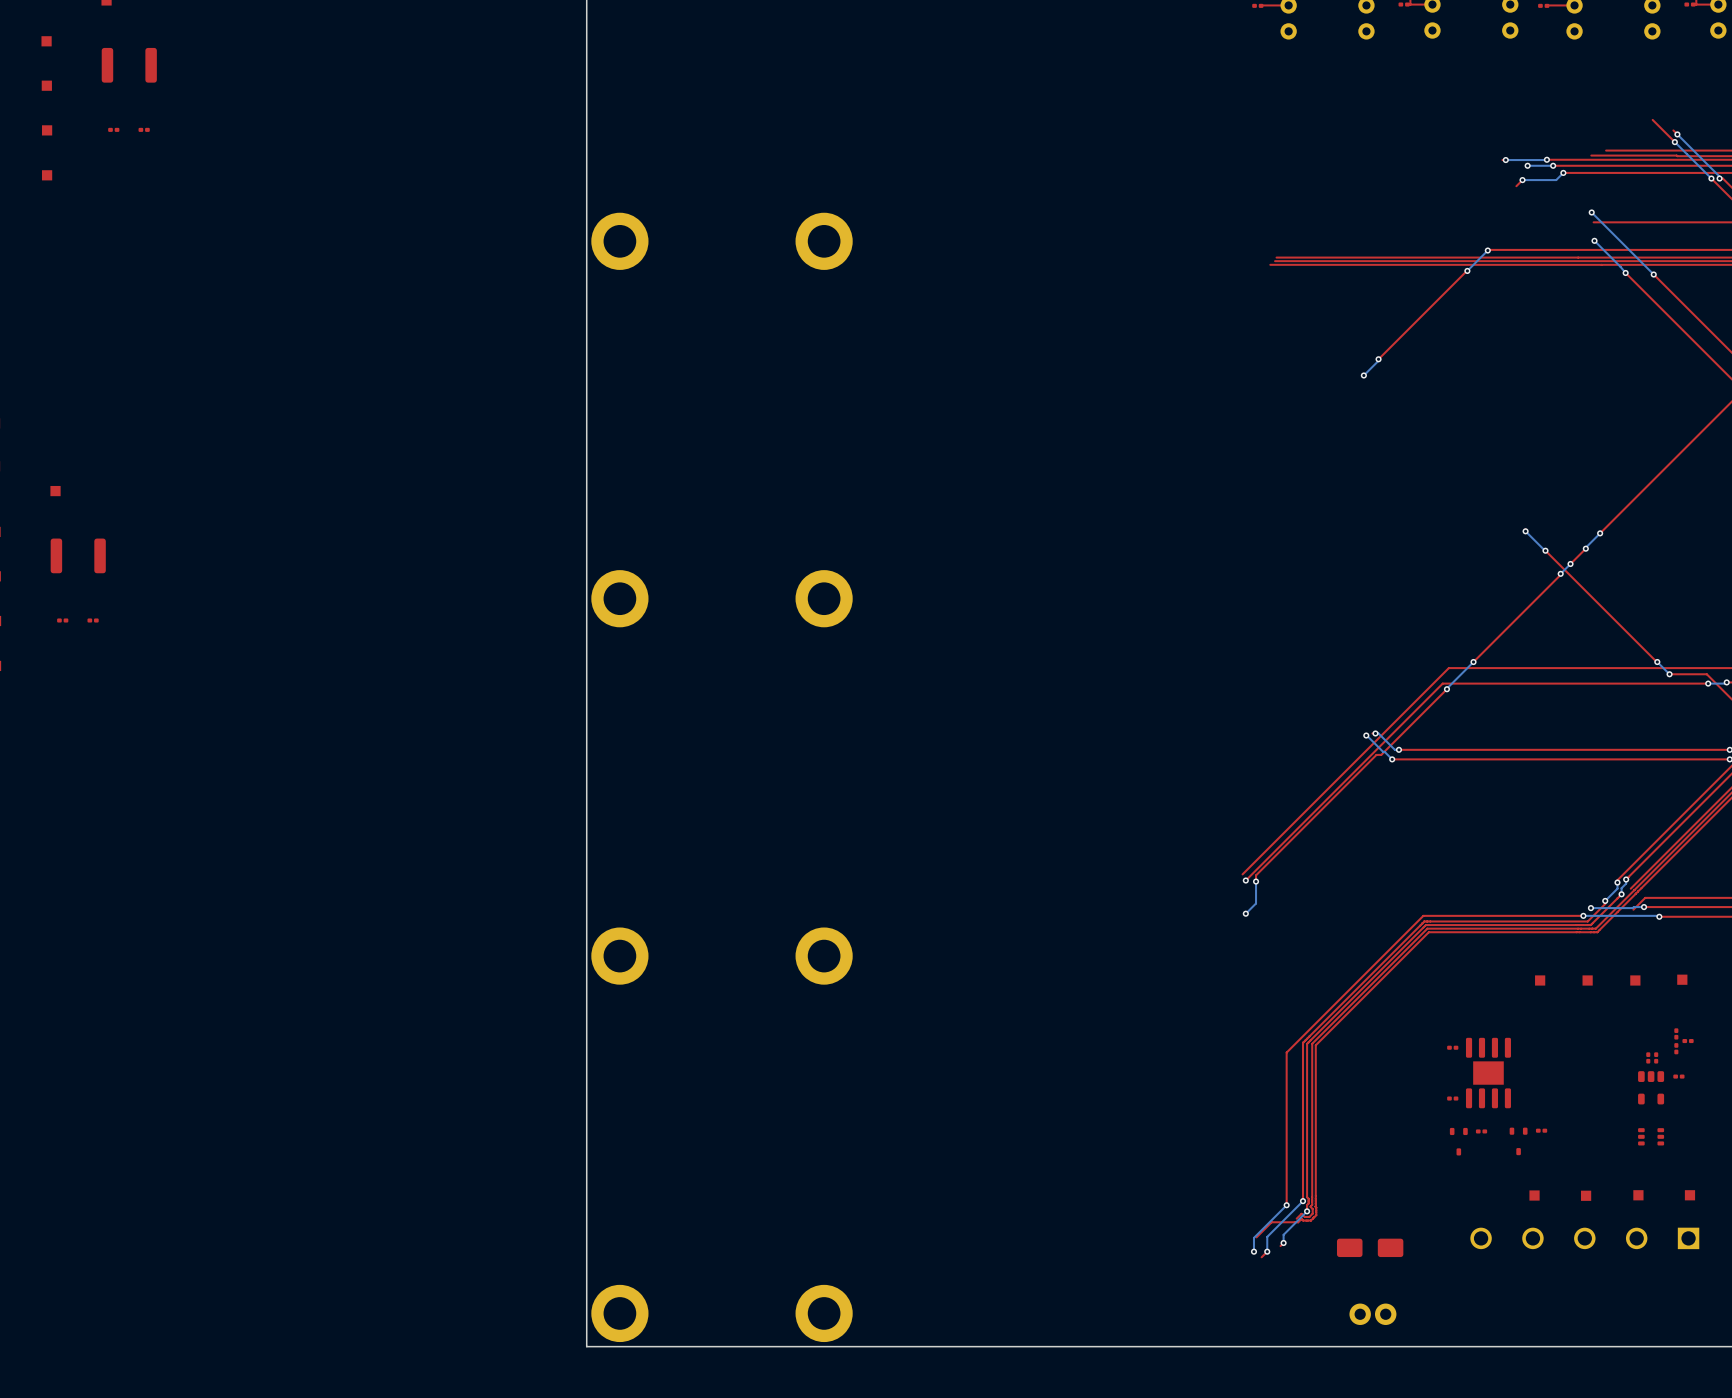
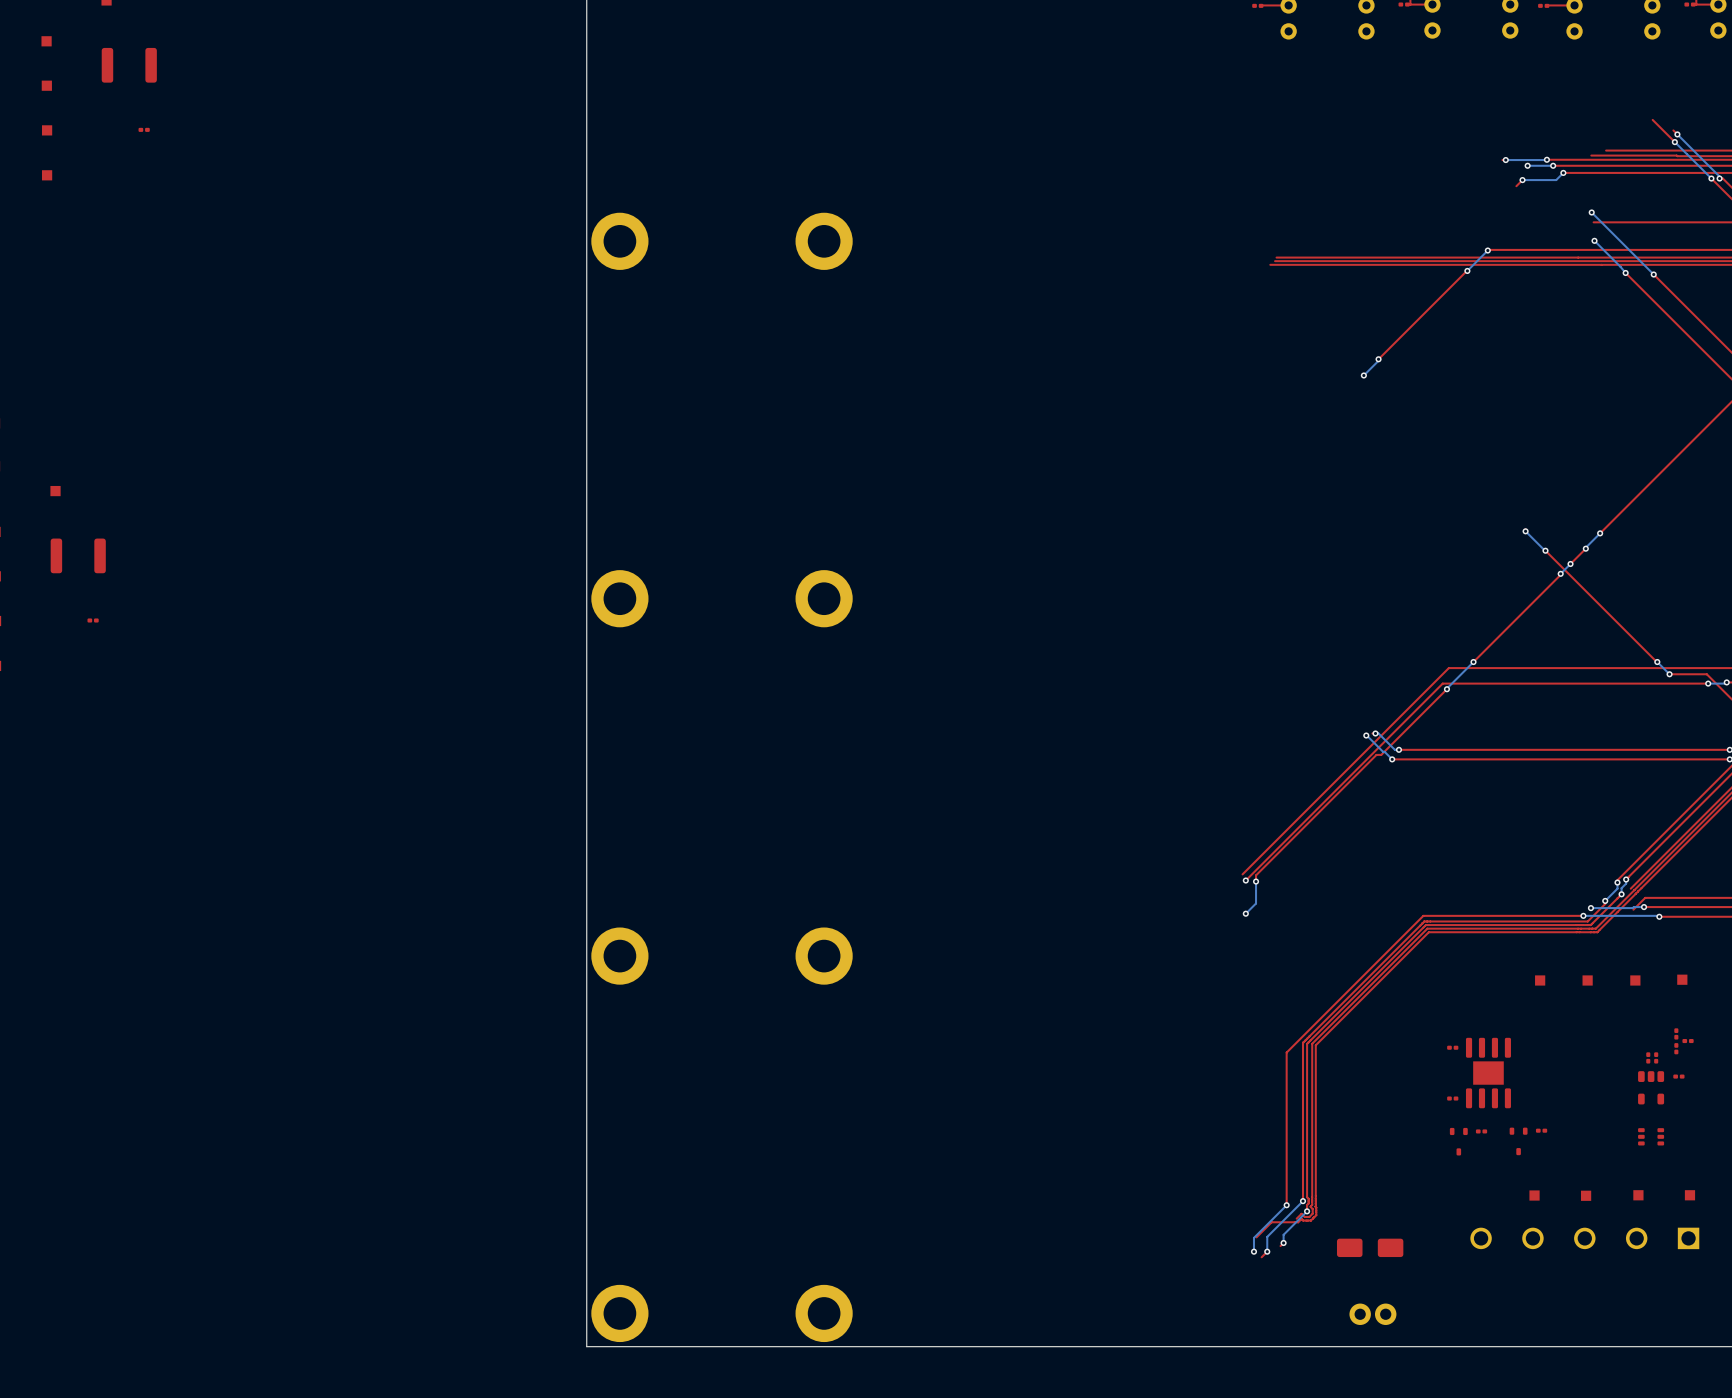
part: (113, 129) -> none
part: (62, 620) -> none

